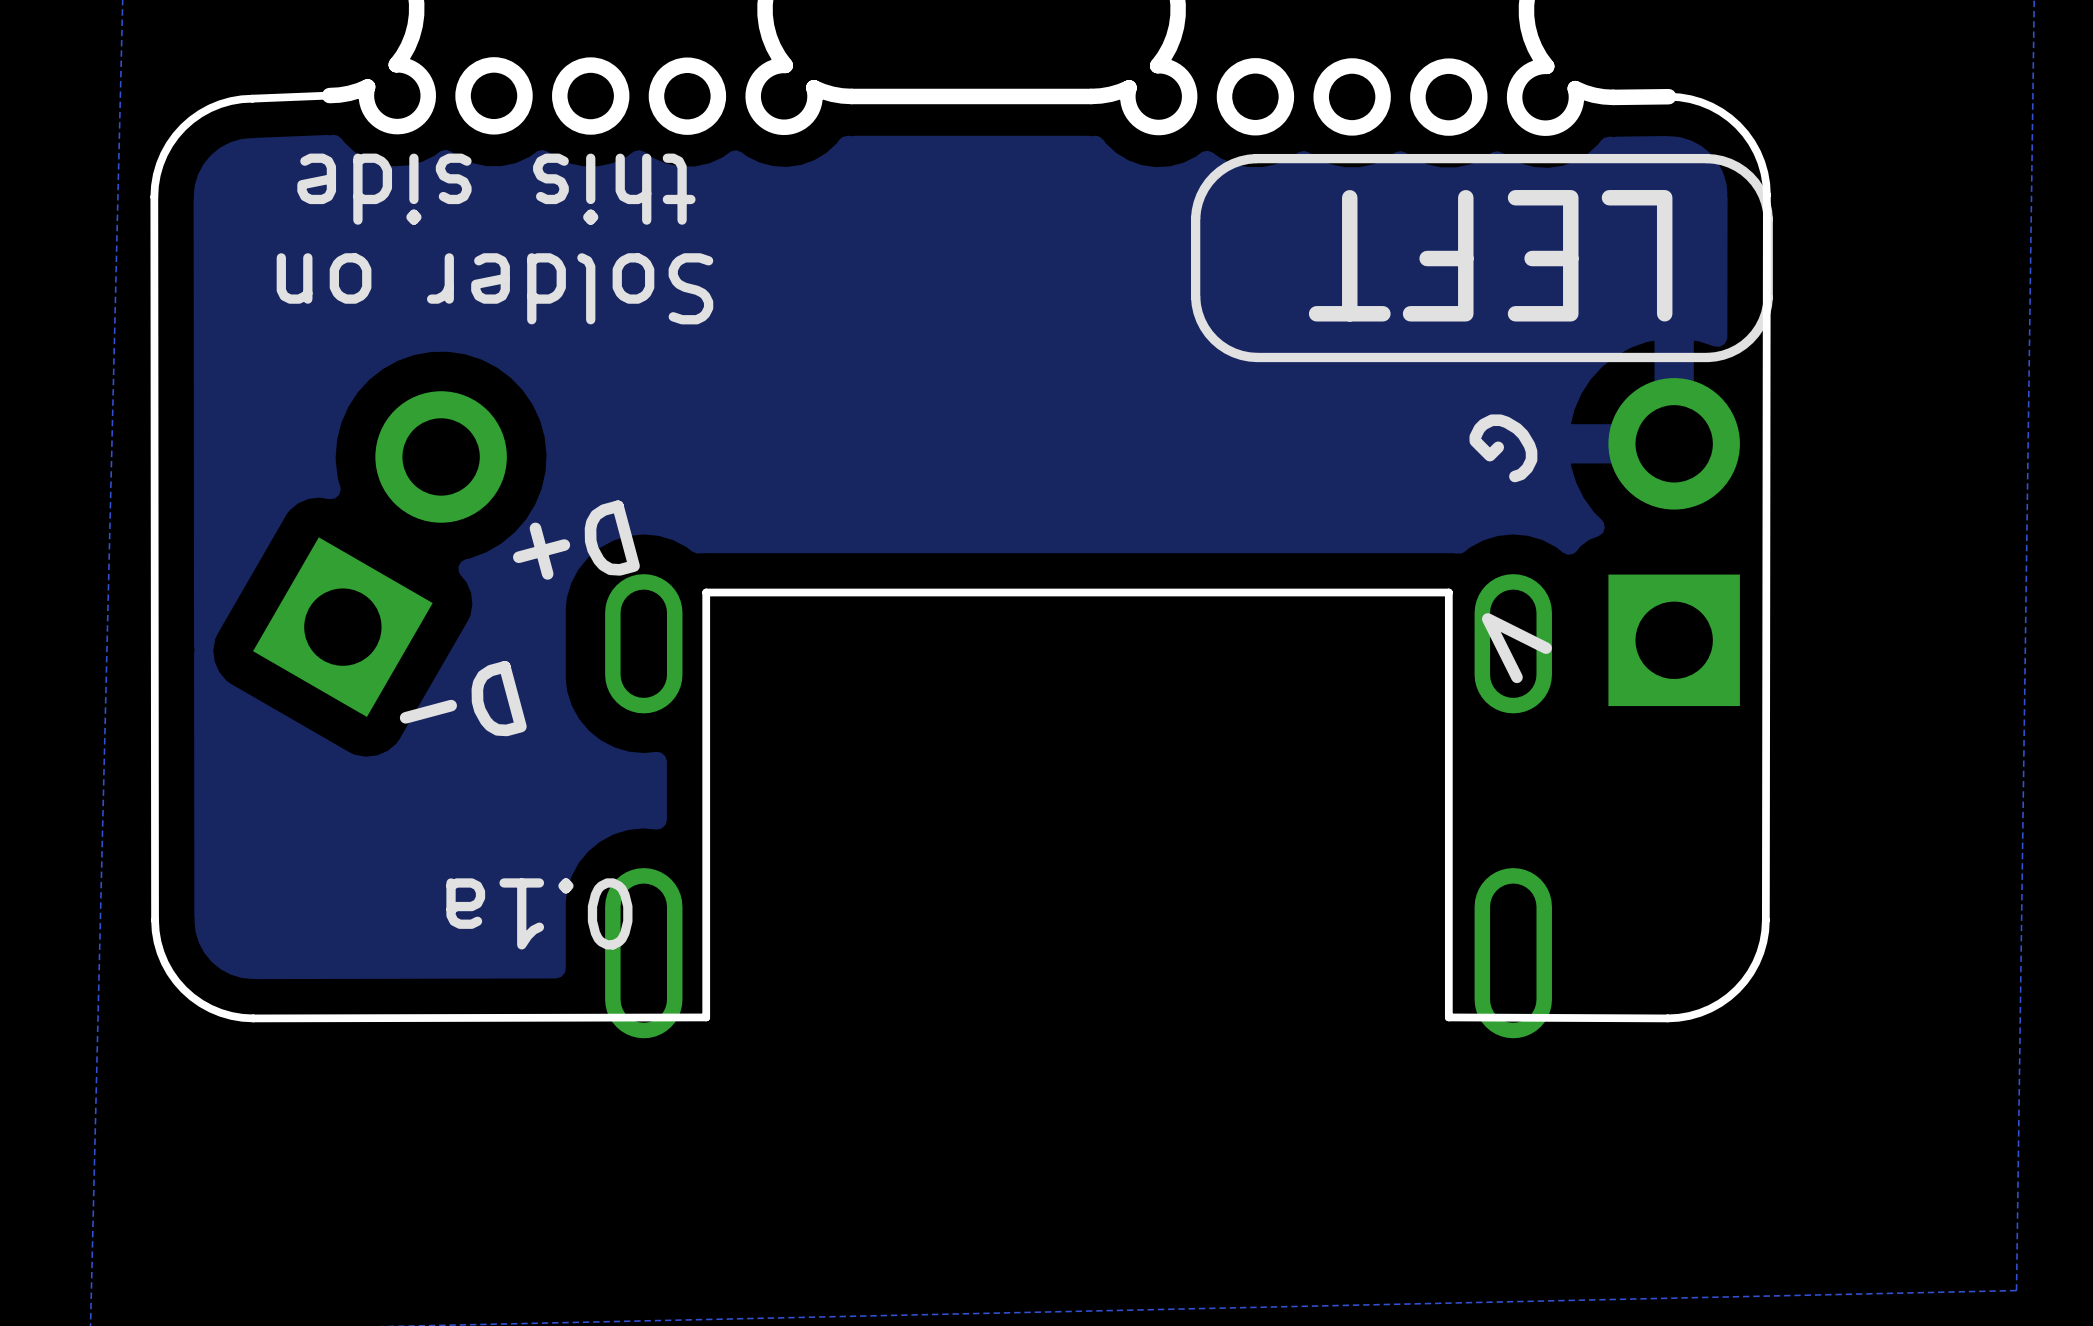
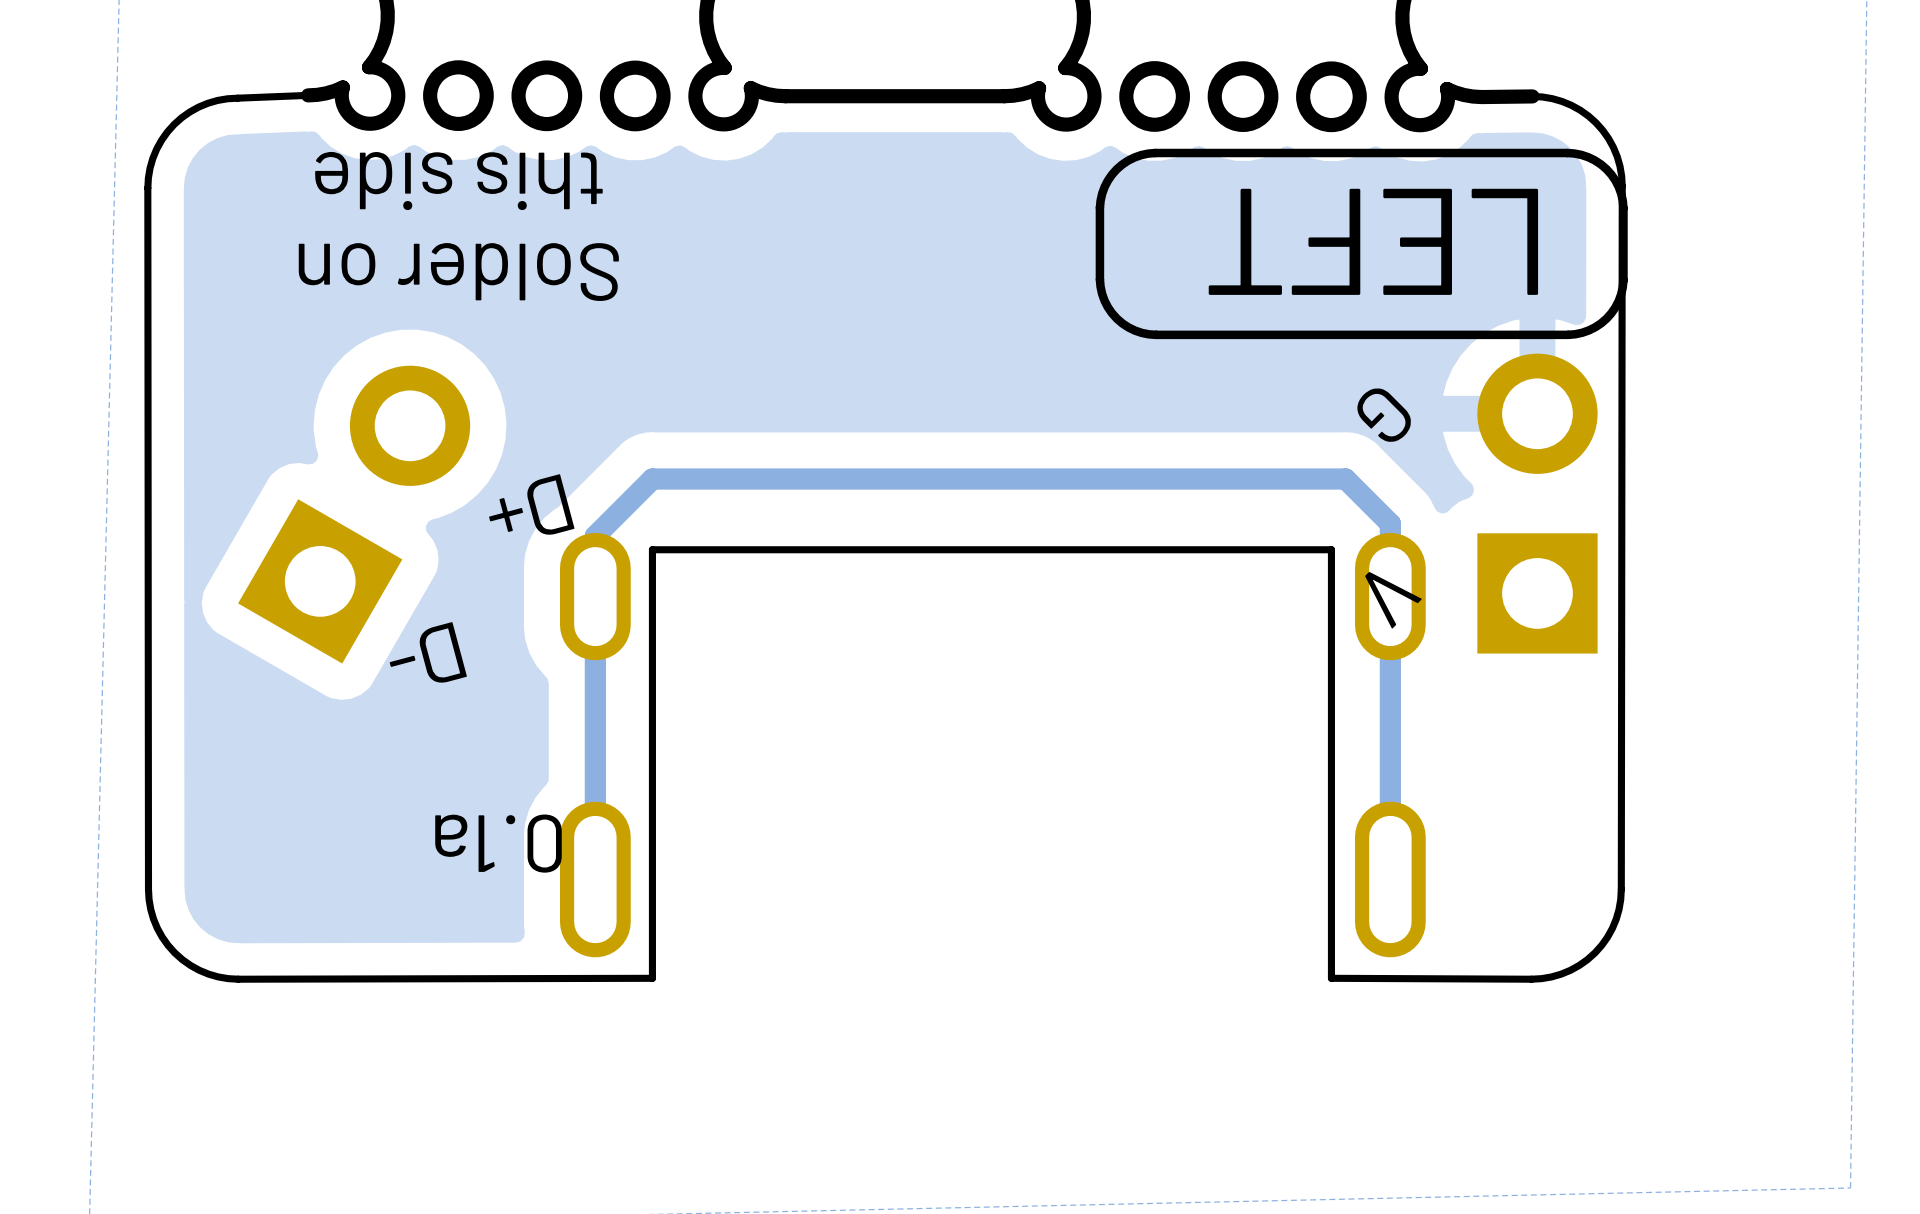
board edge: (1766, 194) (1765, 920) (1760, 952) (1750, 972) (1737, 989) (1719, 1003) (1689, 1015) (1667, 1018) (1448, 1017) -> (1622, 186) (1621, 889) (1616, 919) (1607, 937) (1587, 959) (1570, 970) (1541, 978) (1331, 978) (1331, 938)
board edge: (155, 920) (160, 952) (176, 981) (201, 1003) (231, 1015) (253, 1018) (706, 1017) -> (148, 849) (149, 899) (157, 928) (168, 945) (182, 959) (199, 970) (218, 976) (238, 979) (652, 978) (652, 938)
track: none -> (1390, 879) (1390, 523) (1345, 479) (652, 479) (595, 536) (595, 879)

